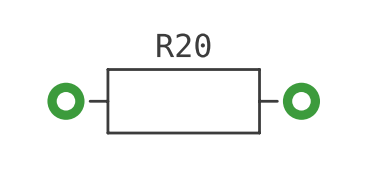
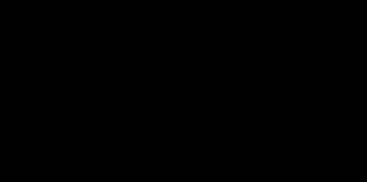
R20: (183, 101) -> none

